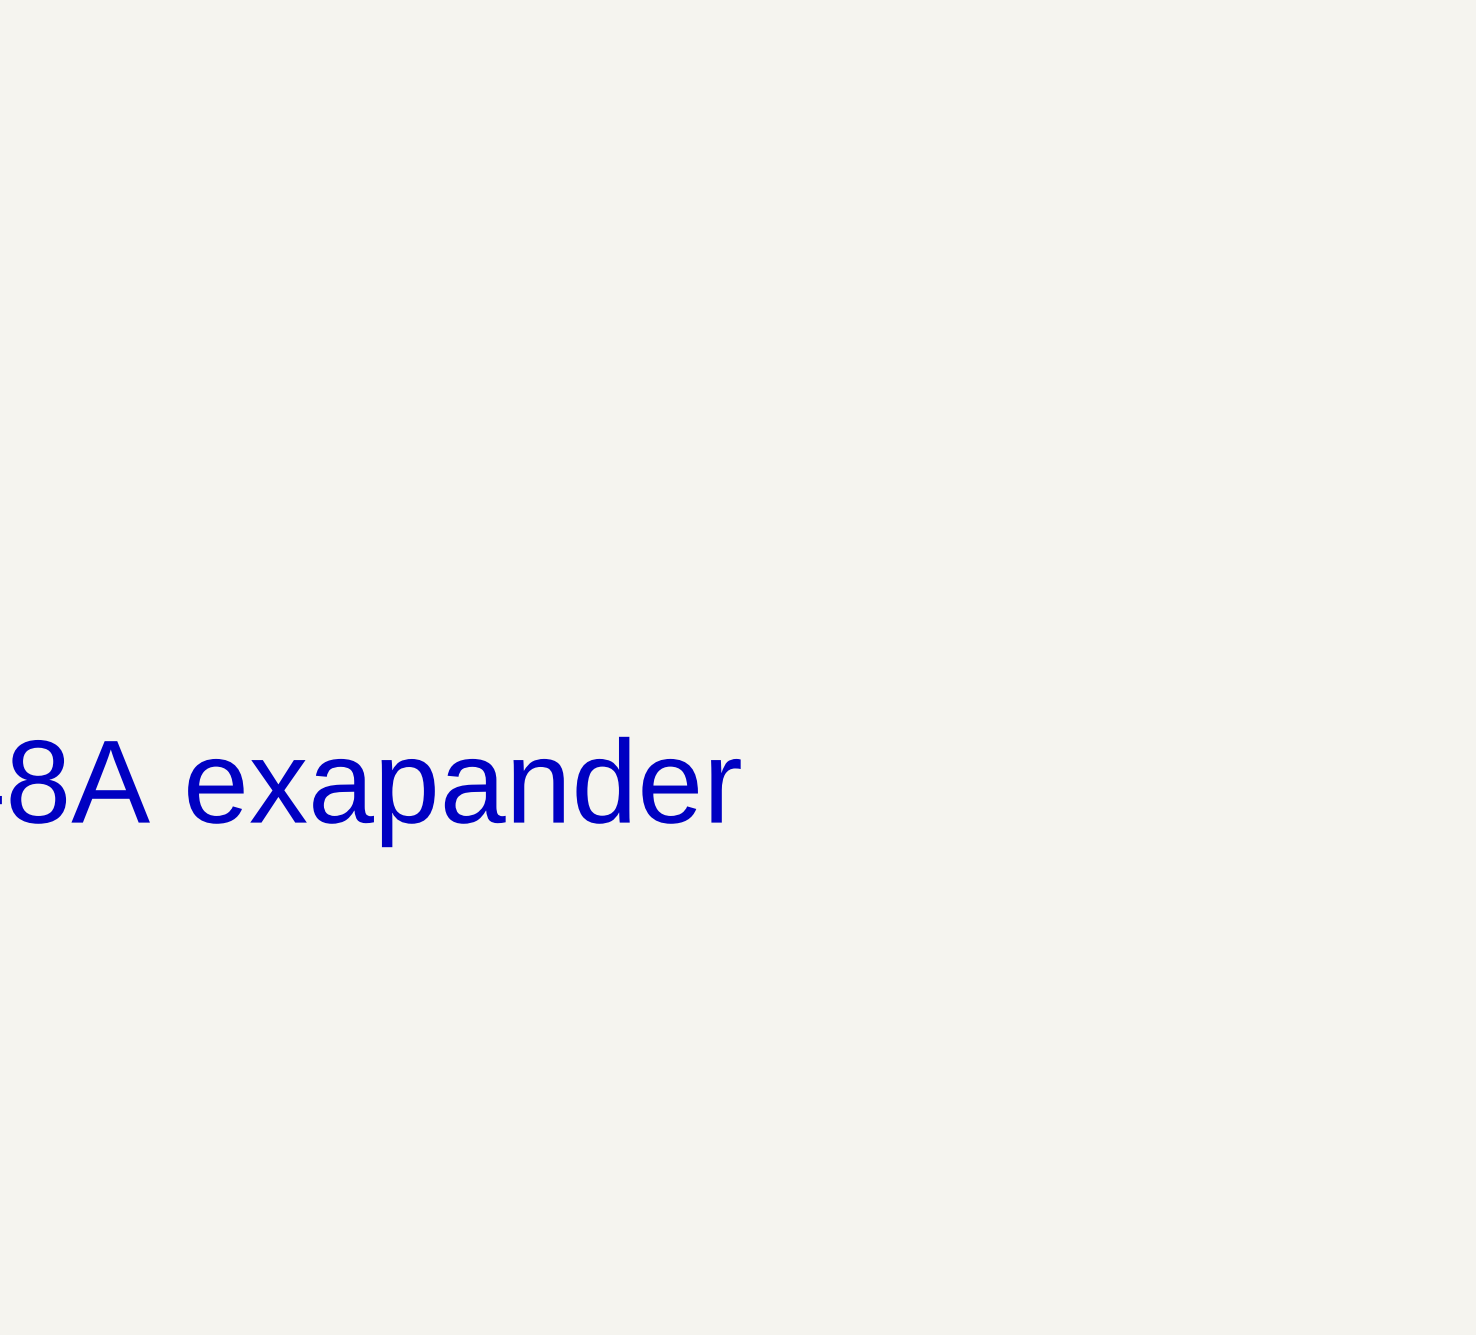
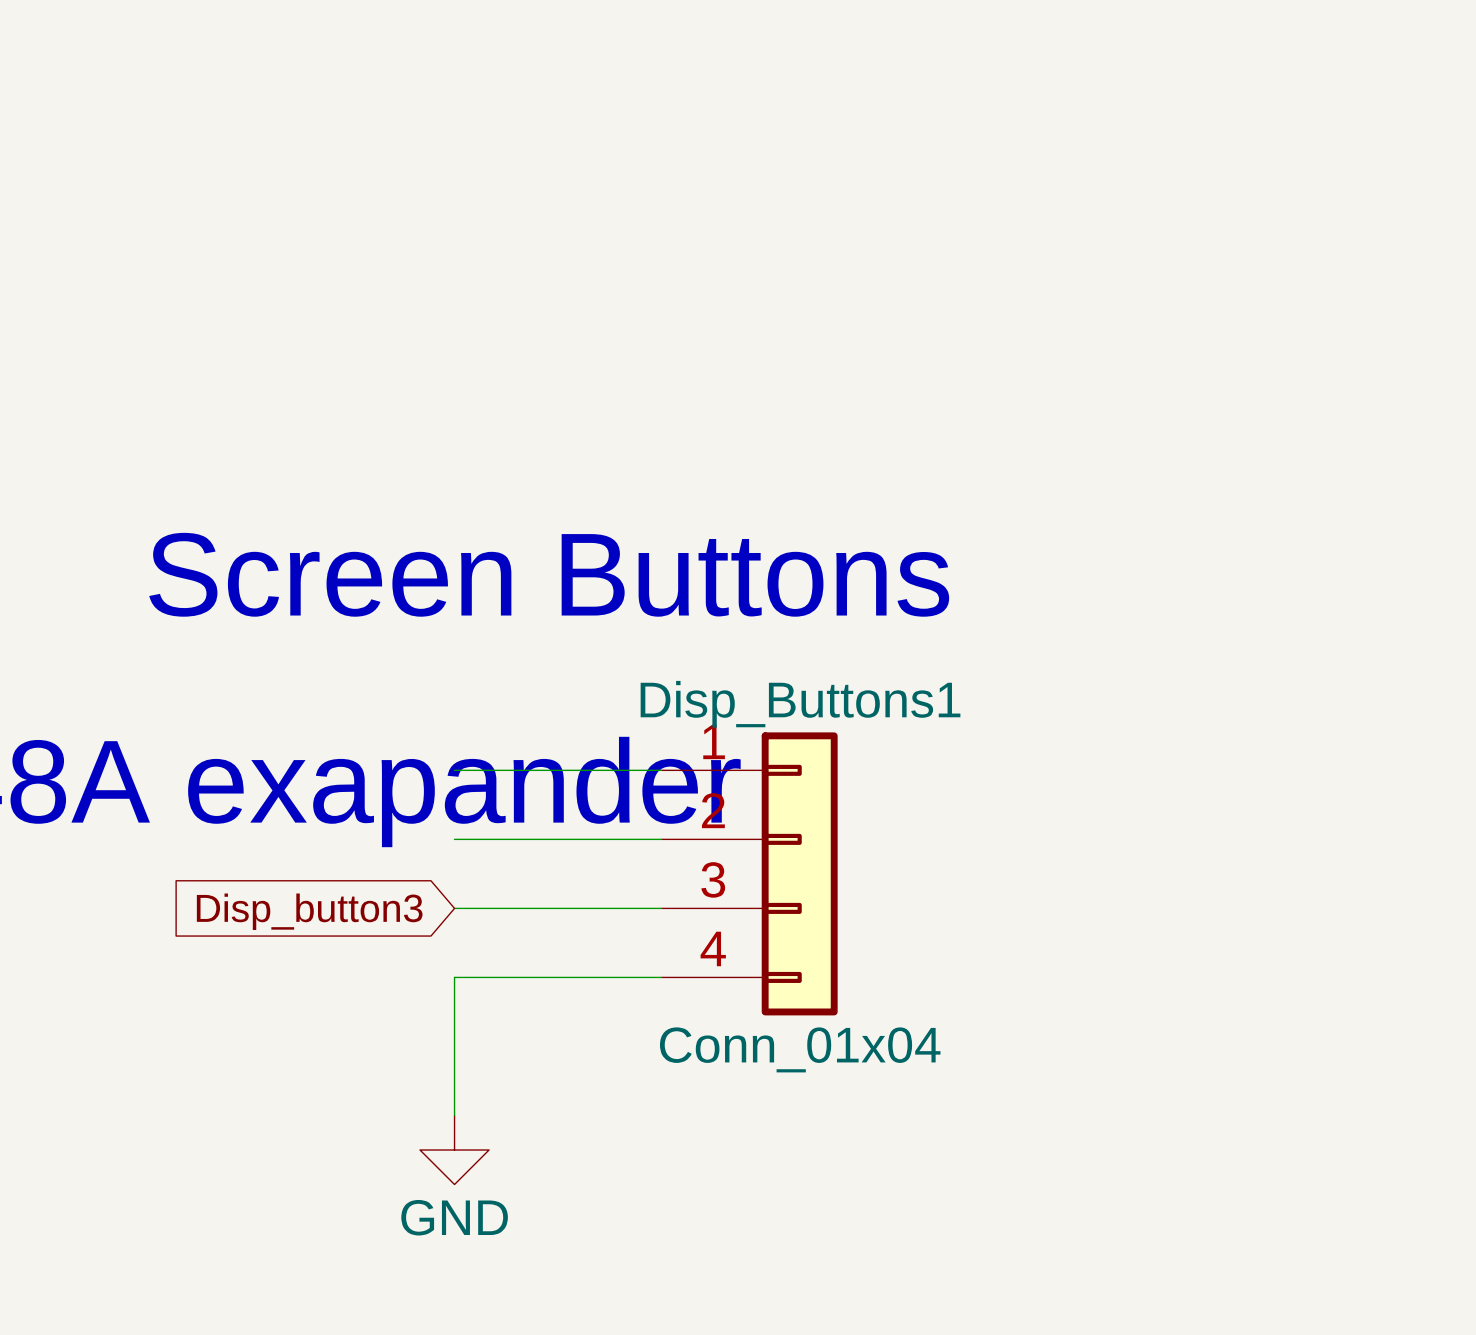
text: none -> Screen Buttons (549, 574)
wire: none -> (454, 770) (661, 770)
wire: none -> (454, 839) (661, 839)
Disp_Buttons1: none -> Conn_01x04 (749, 873)
wire: none -> (454, 908) (661, 908)
global label: none -> Disp_button3 (309, 911)
wire: none -> (661, 977) (454, 977) (454, 1115)
power symbol: none -> GND (454, 1150)

